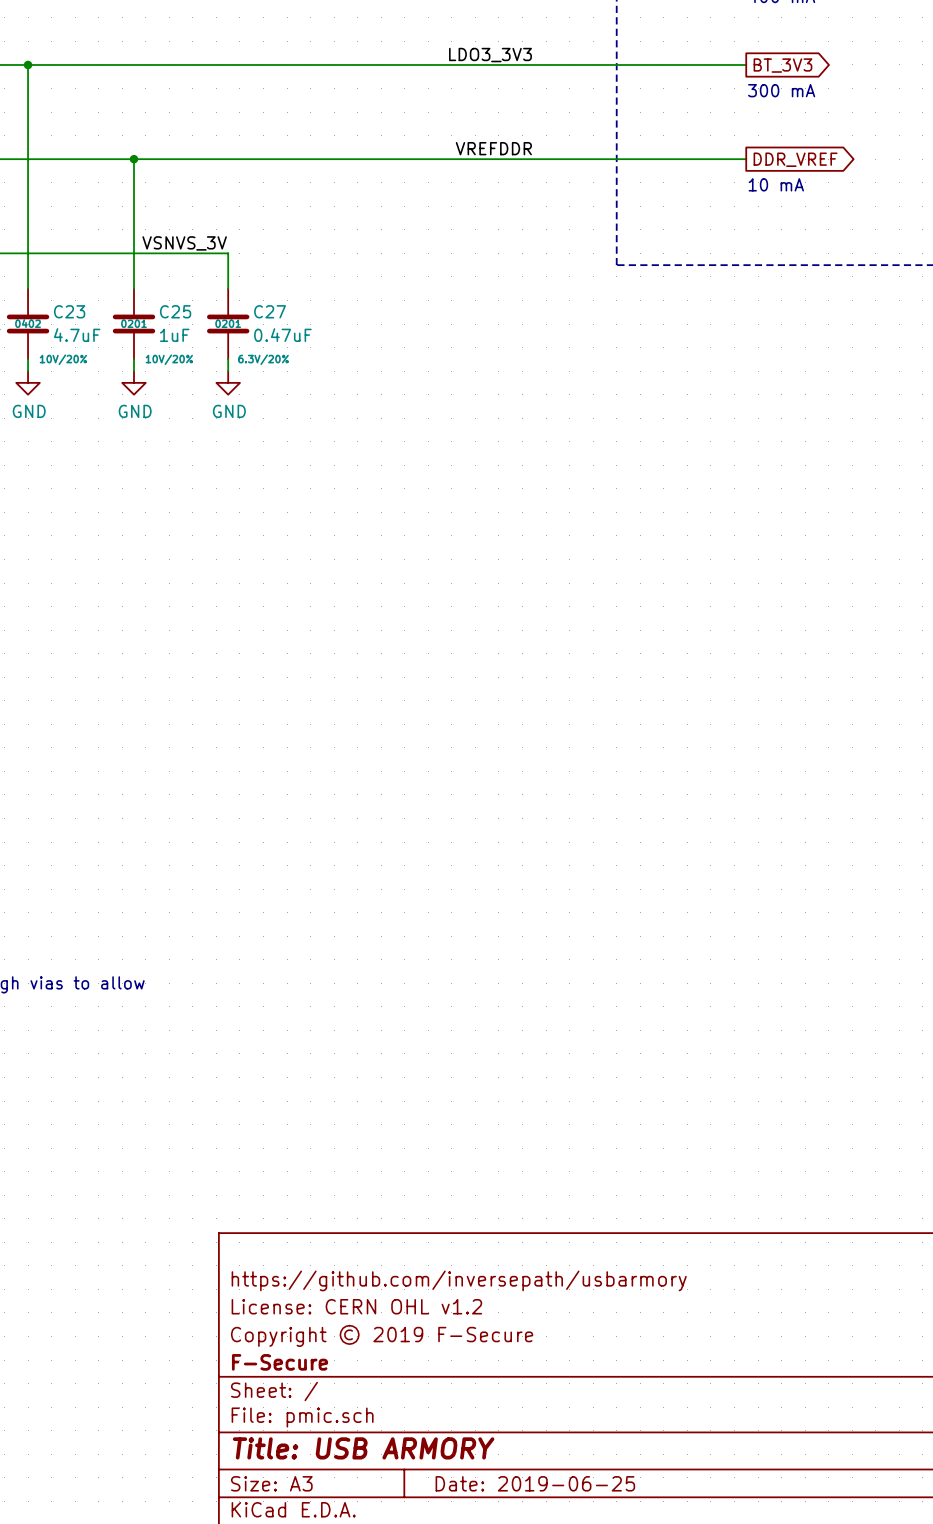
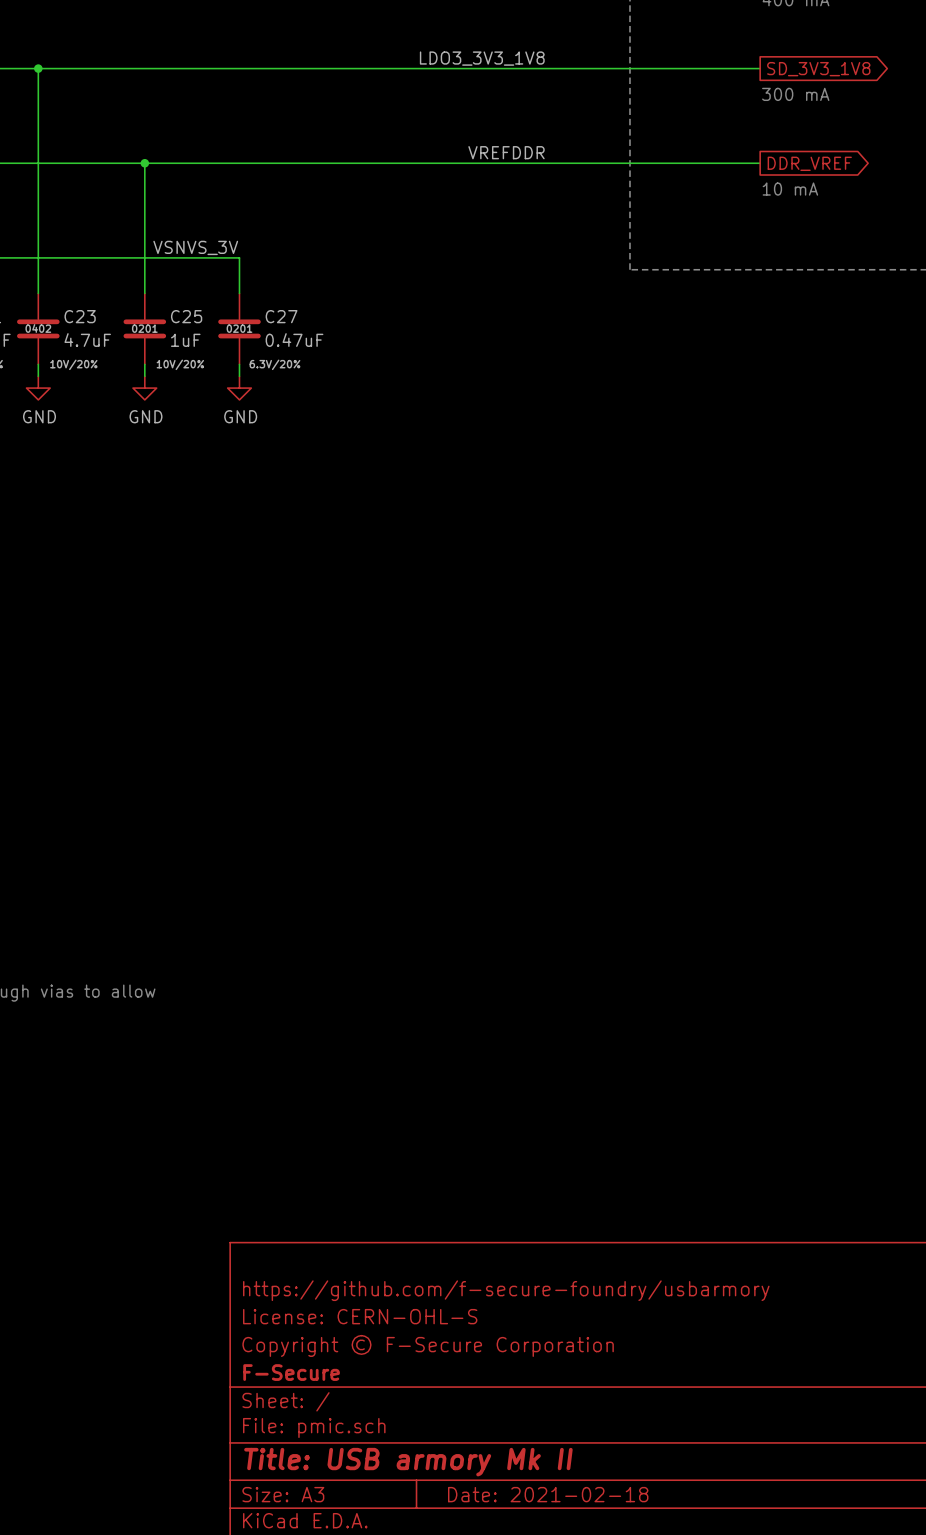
label: LDO3_3V3 (490, 55) -> LDO3_3V3_1V8 (482, 58)
global label: BT_3V3 (782, 65) -> SD_3V3_1V8 (818, 69)
title block: https://github.com/inversepath/usbarmory (459, 1280) -> https://github.com/f-secure-foundry/usbarmory (506, 1290)
title block: License: CERN OHL v1.2 (356, 1306) -> License: CERN-OHL-S (360, 1316)
title block: Copyright © 2019 F-Secure (382, 1335) -> Copyright © F-Secure Corporation (428, 1345)
title block: Title: USB ARMORY (363, 1448) -> Title: USB armory Mk II (408, 1462)
title block: Date: 2019-06-25 (535, 1483) -> Date: 2021-02-18 (548, 1494)

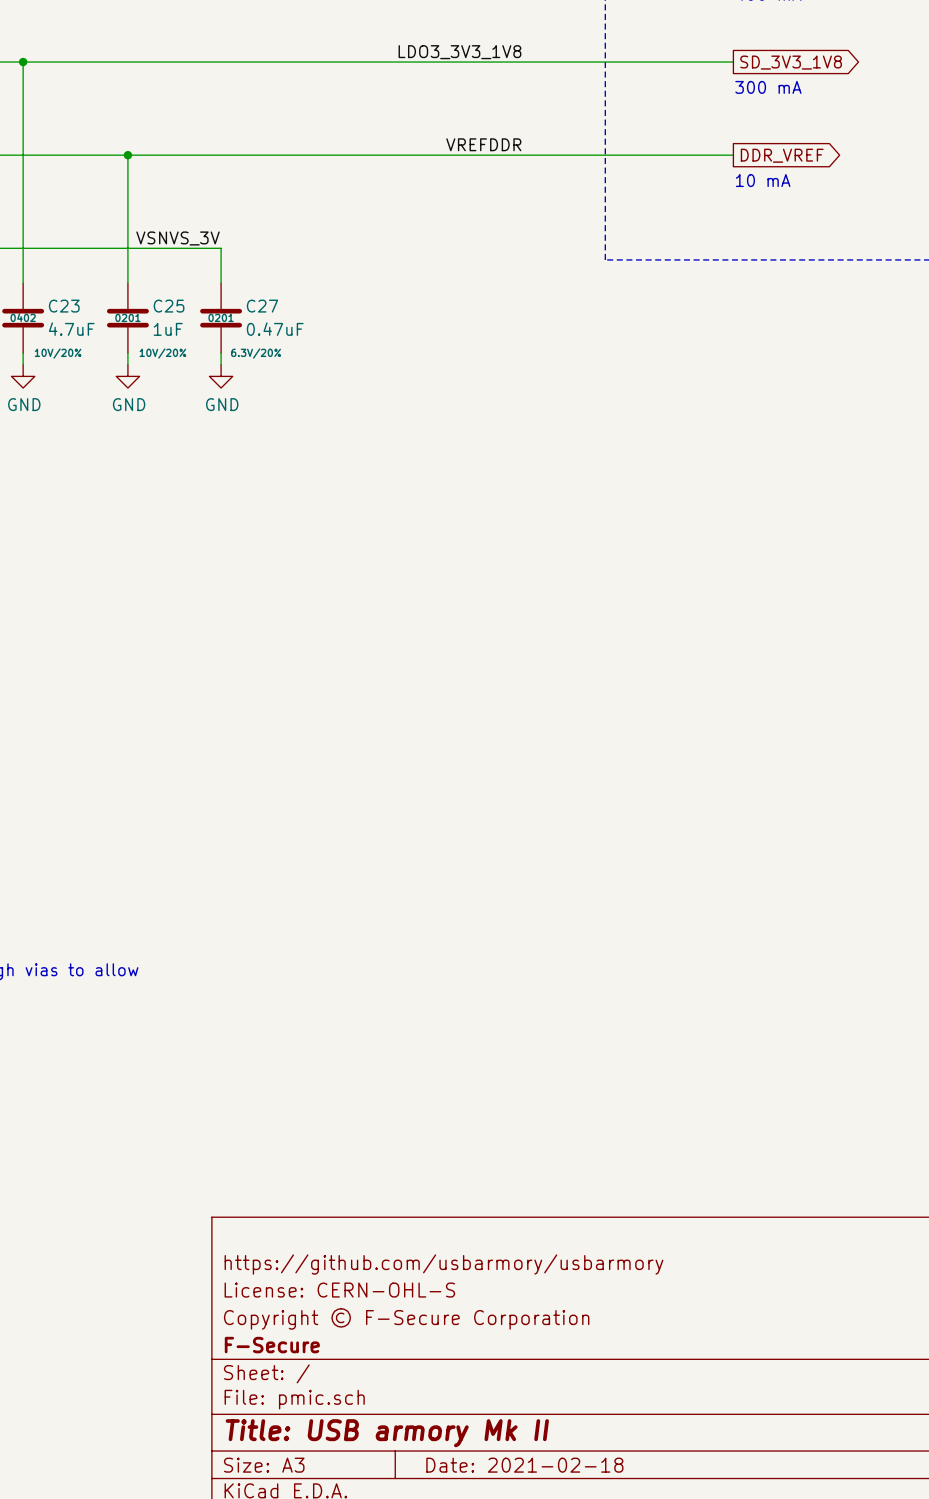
title block: https://github.com/f-secure-foundry/usbarmory (506, 1290) -> https://github.com/usbarmory/usbarmory (443, 1264)

